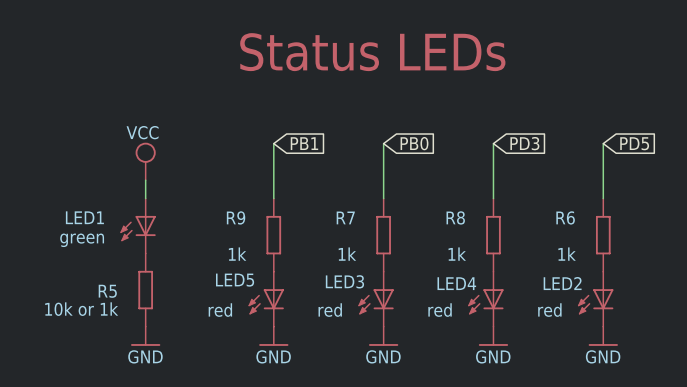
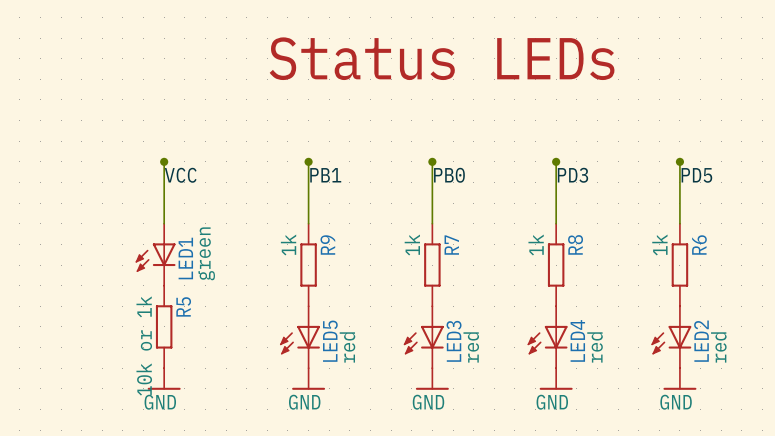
junction: none -> (164, 161)
junction: none -> (308, 161)
global label: PB1 (304, 143) -> none
junction: none -> (432, 161)
global label: PB0 (414, 143) -> none
junction: none -> (556, 161)
global label: PD3 (524, 143) -> none
junction: none -> (679, 161)
global label: PD5 (634, 143) -> none
label: none -> VCC (180, 175)
label: none -> PB1 (325, 175)
label: none -> PB0 (449, 175)
label: none -> PD3 (572, 175)
label: none -> PD5 (696, 175)
power symbol: VCC (145, 161) -> none
LED1 name rotation: 0° (84, 217) -> 90° counterclockwise (185, 258)
LED1 name position: LED1 (84, 217) -> LED1 (185, 258)
R9 name rotation: 0° (236, 217) -> 90° counterclockwise (327, 245)
R9 name position: R9 (236, 217) -> R9 (327, 245)
R7 name rotation: 0° (345, 217) -> 90° counterclockwise (451, 245)
R7 name position: R7 (345, 217) -> R7 (451, 245)
R8 name rotation: 0° (455, 217) -> 90° counterclockwise (575, 244)
R8 name position: R8 (455, 217) -> R8 (575, 244)
R6 name rotation: 0° (565, 217) -> 90° counterclockwise (699, 245)
R6 name position: R6 (565, 217) -> R6 (699, 245)
LED1 value rotation: 0° (82, 240) -> 90° counterclockwise (206, 253)
LED1 value position: green (82, 240) -> green (206, 253)
R9 value rotation: 0° (237, 254) -> 90° counterclockwise (288, 244)
R9 value position: 1k (237, 254) -> 1k (288, 244)
R7 value rotation: 0° (347, 254) -> 90° counterclockwise (412, 244)
R7 value position: 1k (347, 254) -> 1k (412, 244)
R8 value rotation: 0° (457, 254) -> 90° counterclockwise (536, 244)
R8 value position: 1k (457, 254) -> 1k (536, 244)
R6 value rotation: 0° (567, 254) -> 90° counterclockwise (659, 244)
R6 value position: 1k (567, 254) -> 1k (659, 244)
LED5 name rotation: 0° (235, 280) -> 90° counterclockwise (330, 341)
LED5 name position: LED5 (235, 280) -> LED5 (330, 341)
LED3 name rotation: 0° (344, 281) -> 90° counterclockwise (454, 341)
LED3 name position: LED3 (344, 281) -> LED3 (454, 341)
LED4 name rotation: 0° (456, 283) -> 90° counterclockwise (577, 340)
LED4 name position: LED4 (456, 283) -> LED4 (577, 340)
LED2 name rotation: 0° (562, 283) -> 90° counterclockwise (701, 341)
LED2 name position: LED2 (562, 283) -> LED2 (701, 341)
R5 name rotation: 0° (107, 291) -> 90° counterclockwise (183, 306)
R5 name position: R5 (107, 291) -> R5 (183, 306)
R5 value rotation: 0° (81, 309) -> 90° counterclockwise (144, 345)
LED5 value rotation: 0° (220, 310) -> 90° counterclockwise (347, 347)
LED5 value position: red (220, 310) -> red (347, 347)
LED3 value rotation: 0° (330, 310) -> 90° counterclockwise (471, 347)
LED3 value position: red (330, 310) -> red (471, 347)
LED4 value rotation: 0° (440, 310) -> 90° counterclockwise (595, 347)
LED4 value position: red (440, 310) -> red (595, 347)
LED2 value rotation: 0° (549, 310) -> 90° counterclockwise (718, 347)
LED2 value position: red (549, 310) -> red (718, 347)

